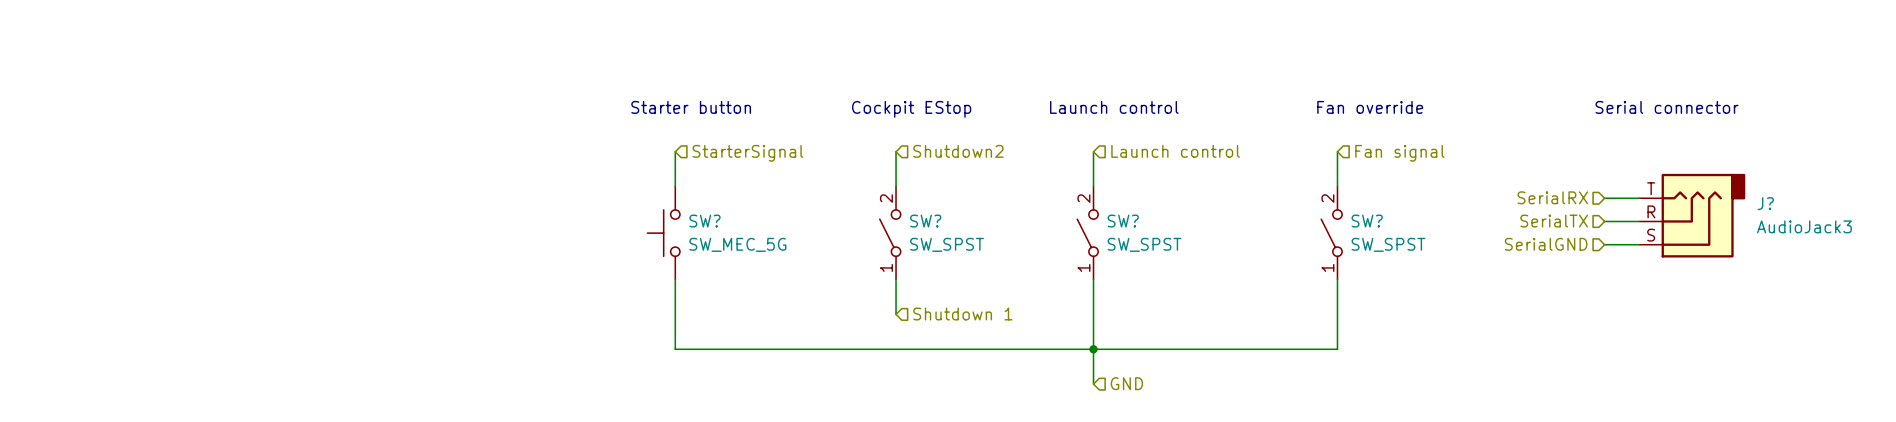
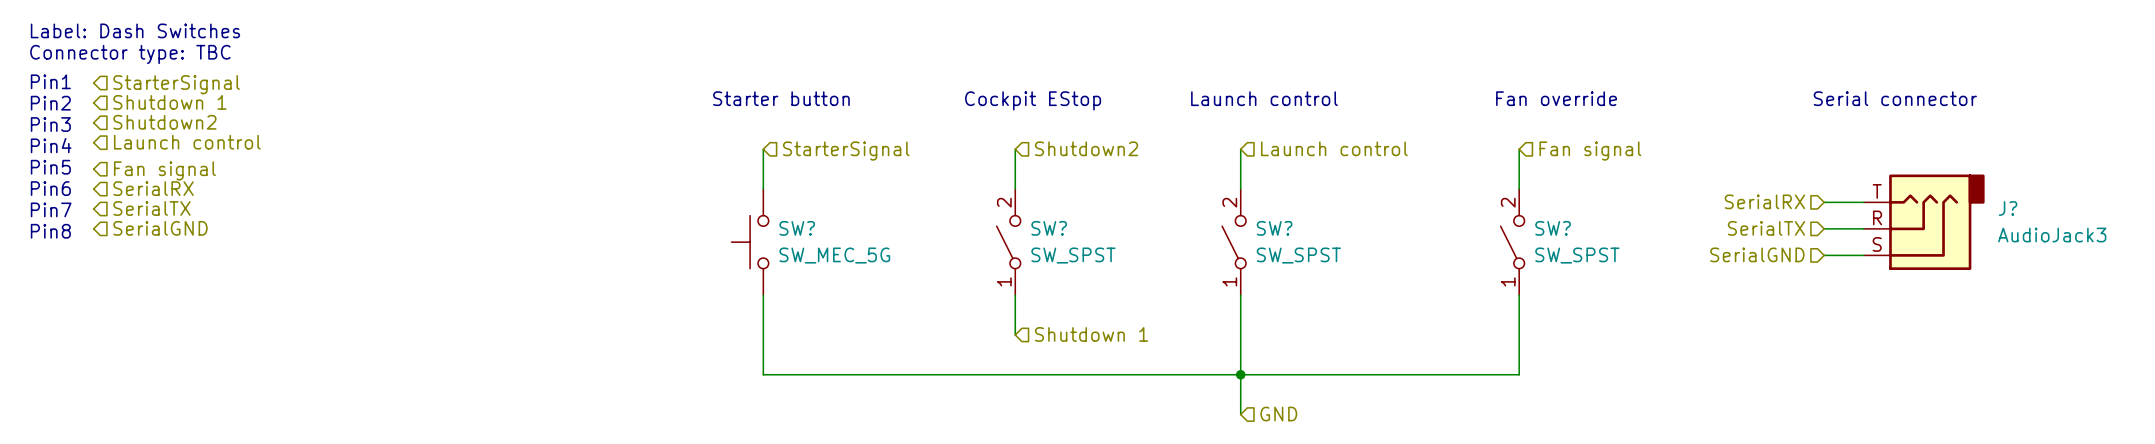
text: none -> Label: Dash Switches (135, 30)
text: none -> Connector type: TBC (130, 54)
text: none -> Pin1 (50, 81)
hierarchical label: none -> StarterSignal (176, 84)
hierarchical label: none -> Shutdown 1 (169, 102)
text: none -> Pin2 (50, 103)
hierarchical label: none -> Shutdown2 (164, 122)
text: none -> Pin3 (50, 124)
hierarchical label: none -> Launch control (187, 142)
text: none -> Pin4 (51, 145)
text: none -> Pin5 (50, 167)
hierarchical label: none -> Fan signal (164, 170)
text: none -> Pin6 (50, 188)
hierarchical label: none -> SerialRX (153, 188)
hierarchical label: none -> SerialTX (151, 208)
text: none -> Pin7 (51, 209)
hierarchical label: none -> SerialGND (160, 228)
text: none -> Pin8 (50, 231)

